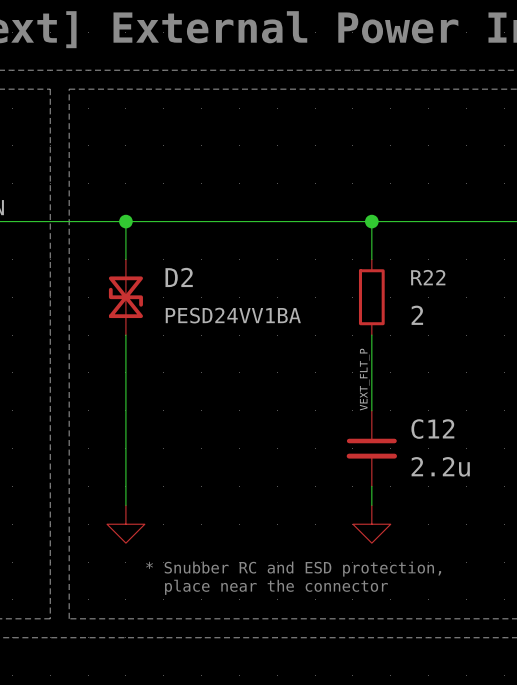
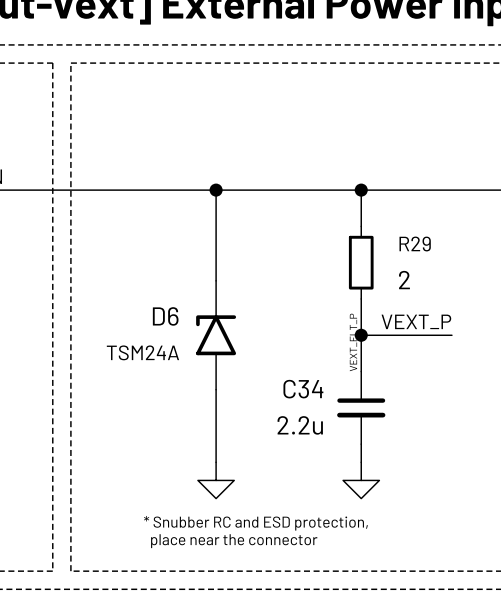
wire: (125, 221) (125, 259) -> none
junction: (125, 221) -> none
wire: none -> (216, 190) (216, 280)
junction: none -> (216, 190)
R22 name: R22 (428, 277) -> R29 (415, 244)
D2: PESD24VV1BA (125, 297) -> none
wire: (125, 335) (125, 505) -> none
label: none -> VEXT_P (416, 321)
D6: none -> TSM24A (216, 335)
wire: none -> (361, 335) (451, 335)
junction: none -> (361, 335)
wire: none -> (216, 389) (216, 462)
C12 name: C12 (432, 429) -> C34 (303, 389)
C12 value position: 2.2u (440, 466) -> 2.2u (300, 425)
power symbol position: (125, 524) -> (216, 480)

